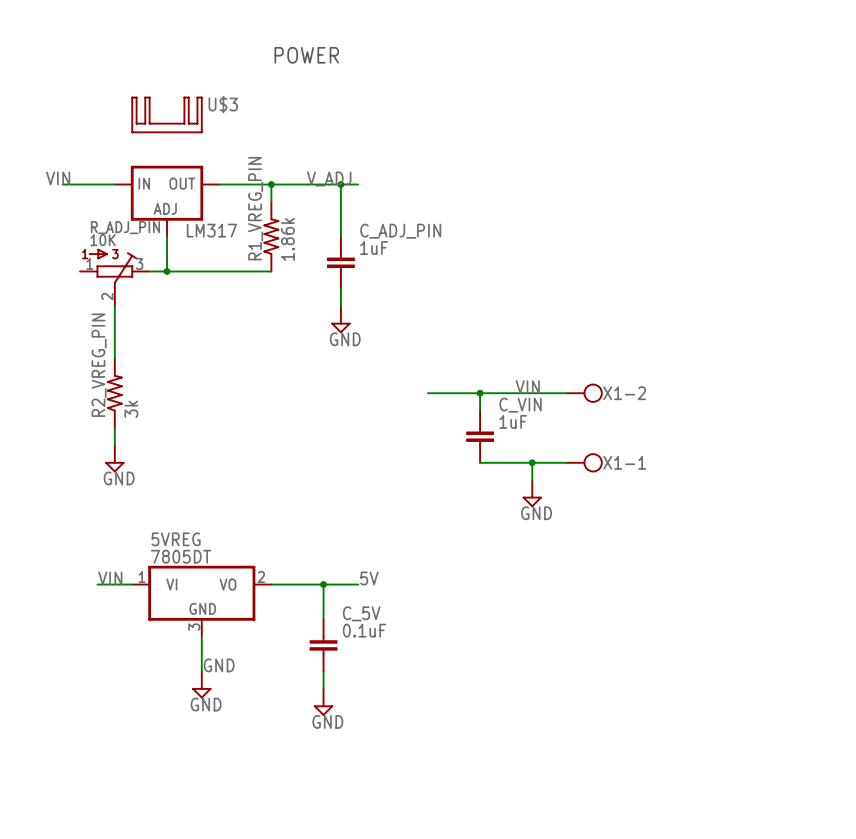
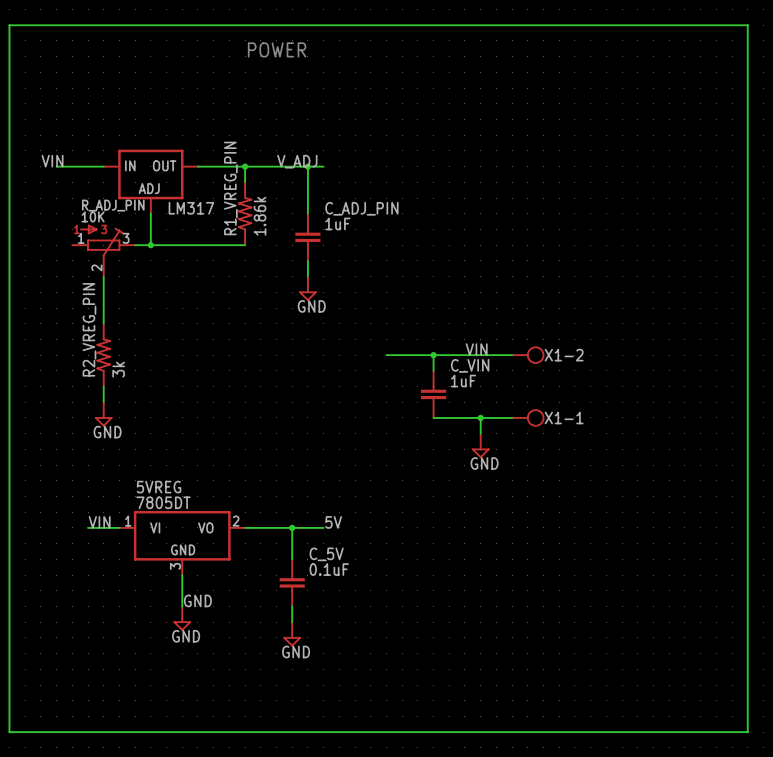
wire: none -> (9, 25) (747, 25) (747, 732) (9, 732) (9, 25)
U$3: (167, 114) -> none

